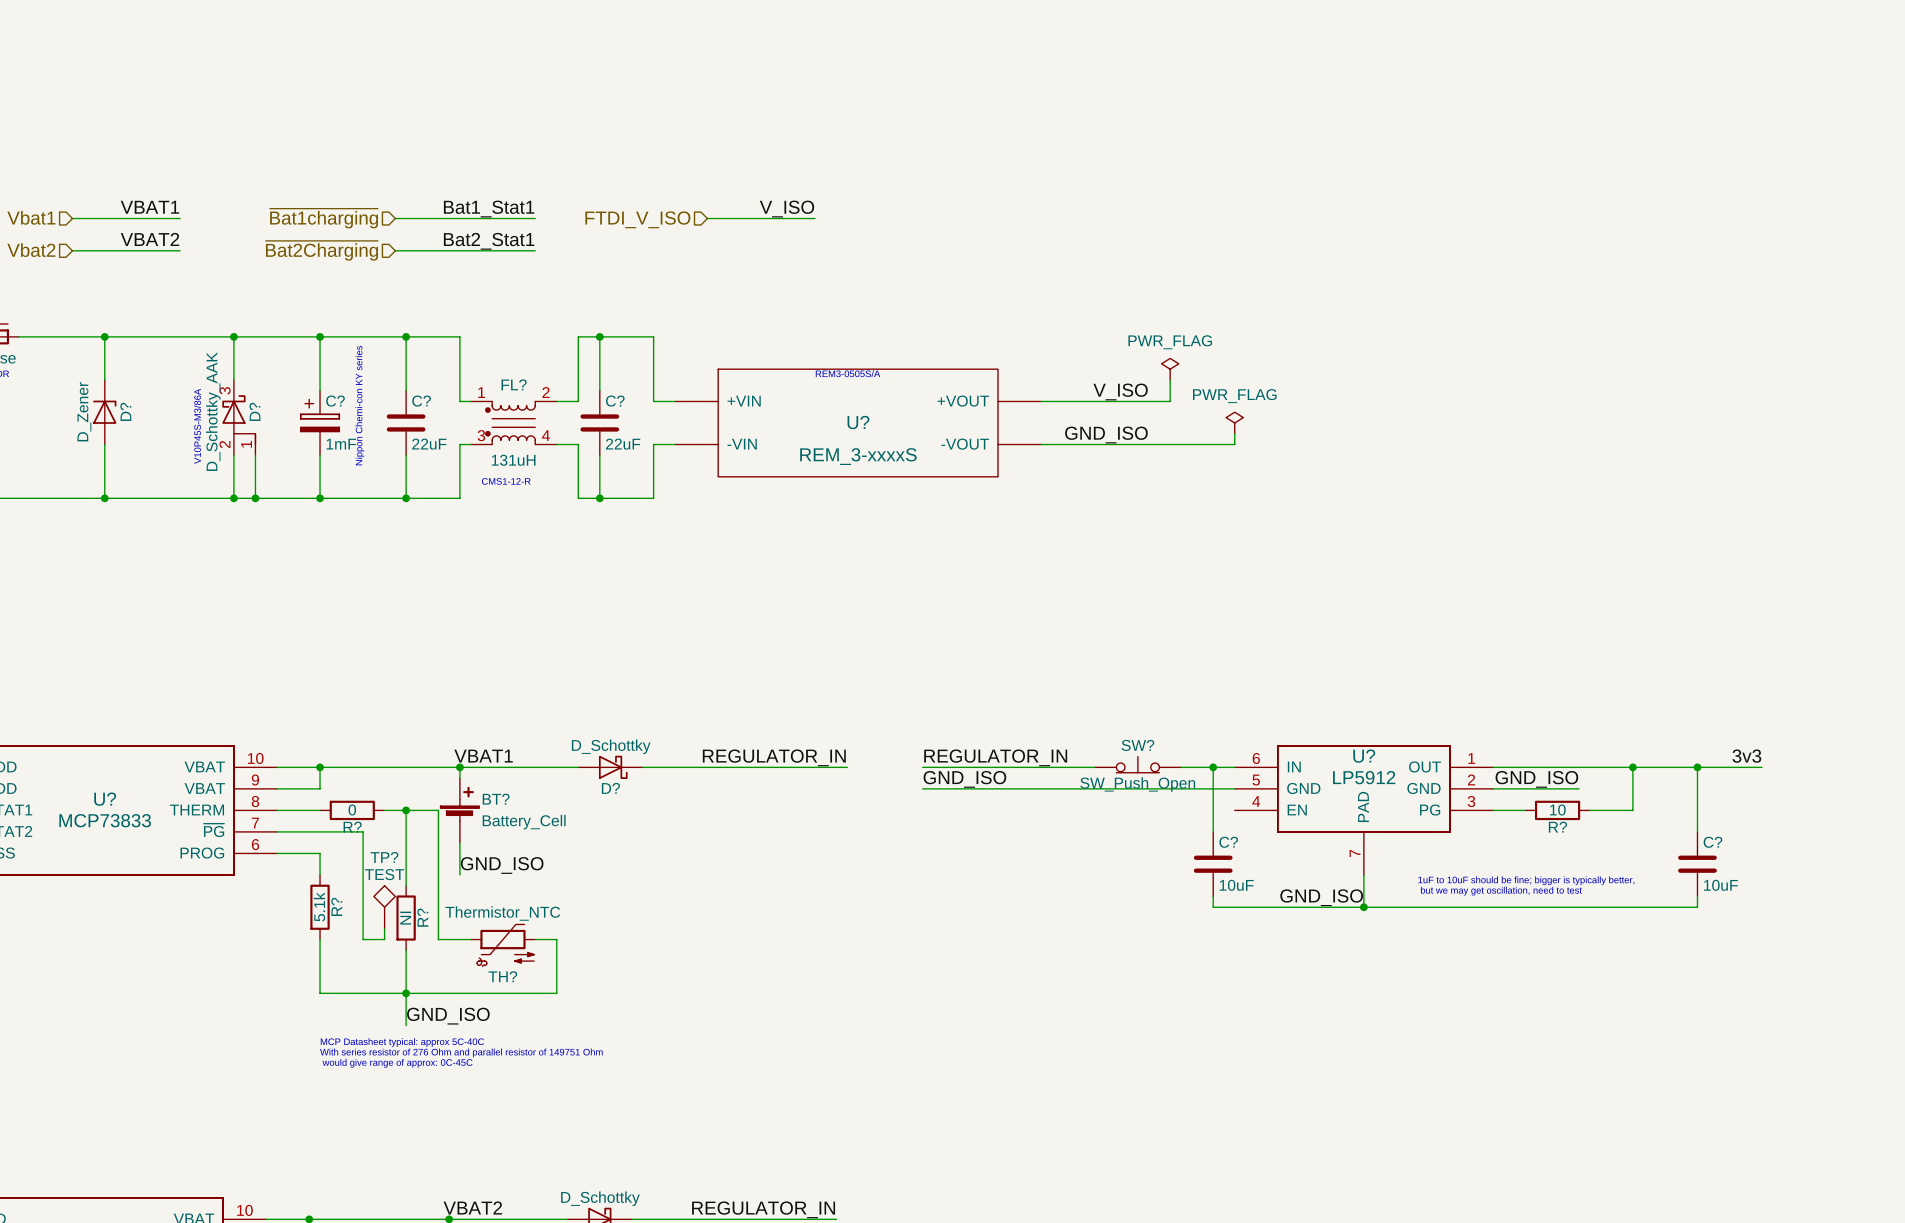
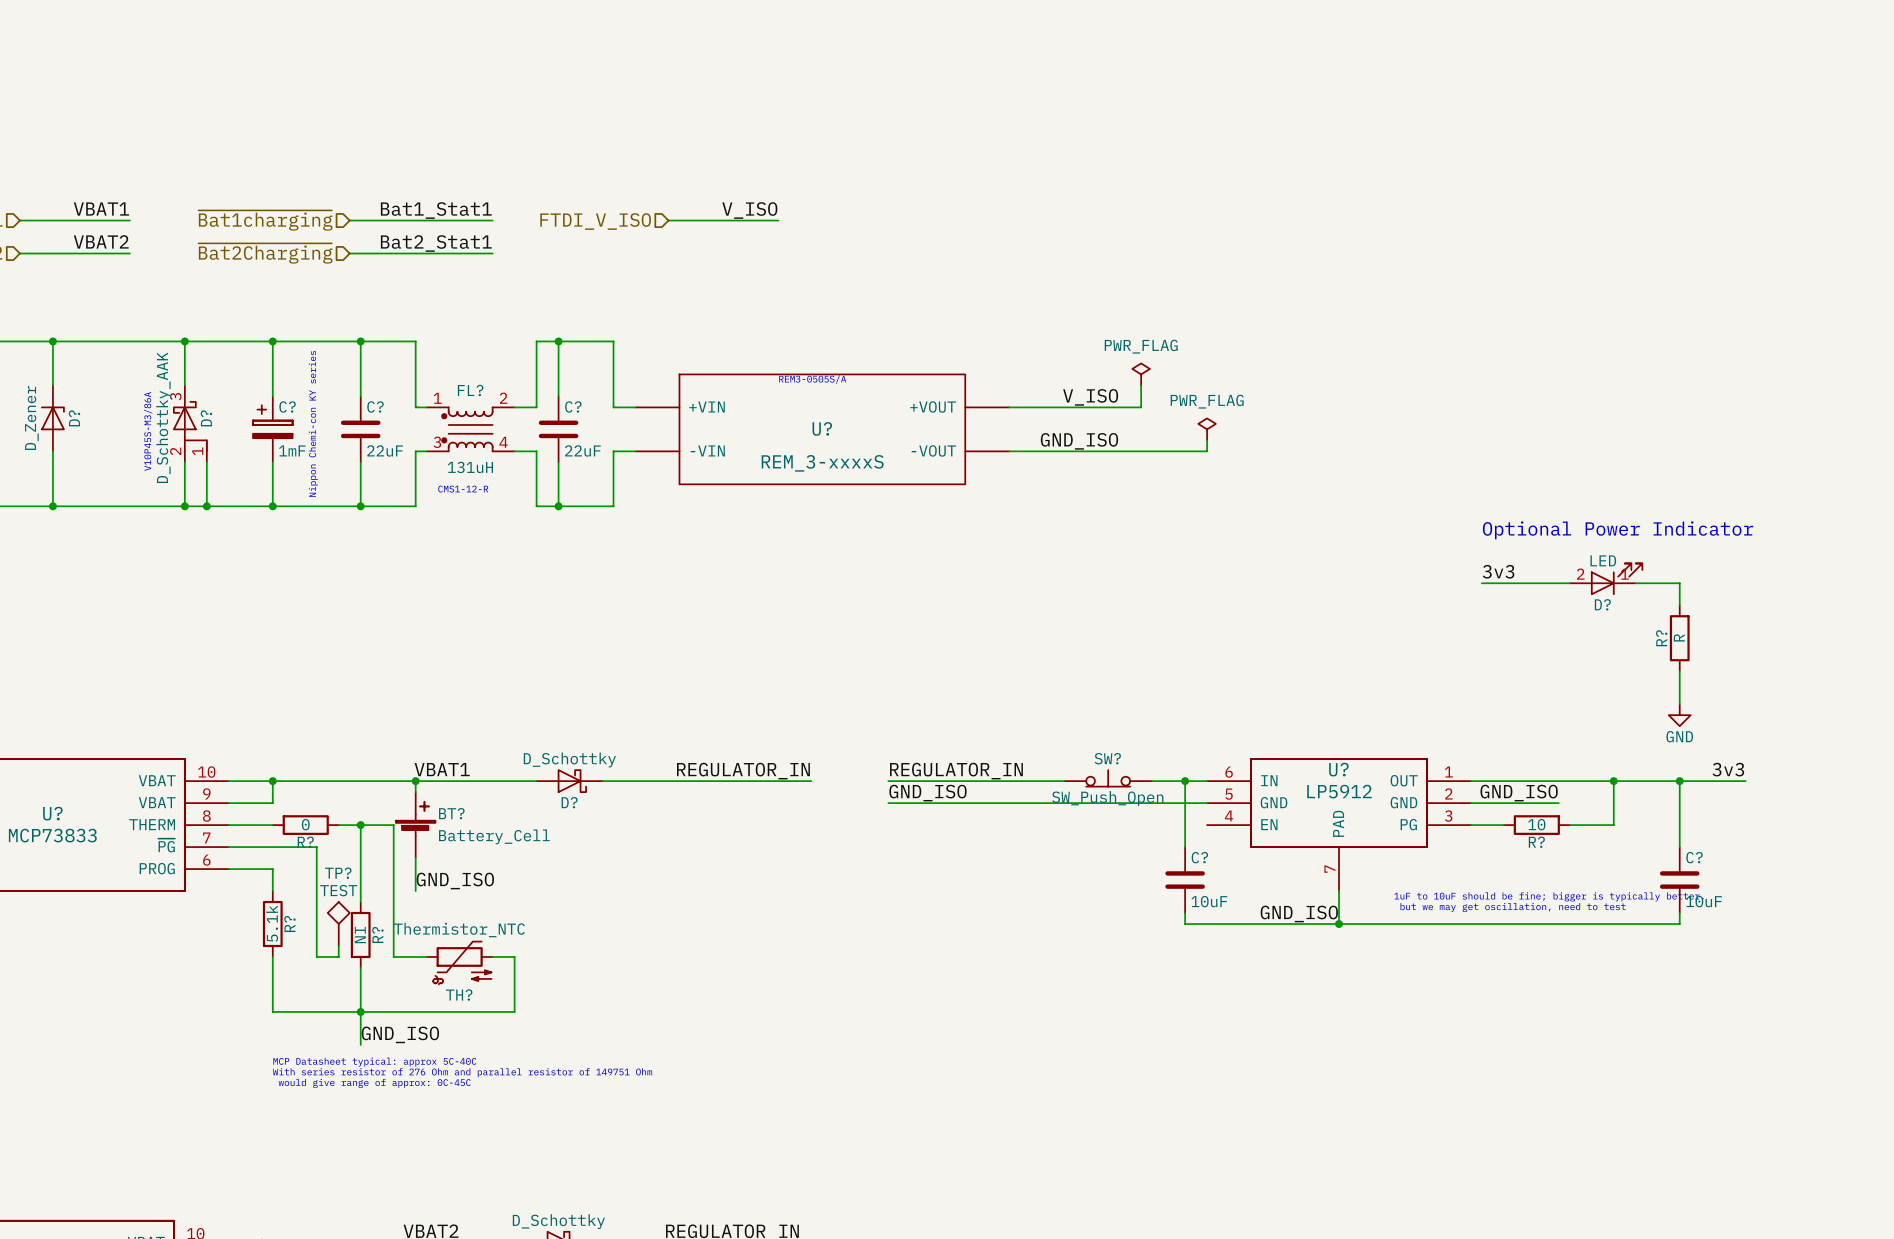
text: none -> Optional Power Indicator (1618, 530)
label: none -> 3v3 (1498, 571)
D?: none -> LED (1606, 579)
wire: none -> (1481, 583) (1569, 583)
wire: none -> (1635, 583) (1679, 583) (1679, 605)
R?: none -> R (1679, 638)
wire: none -> (1679, 671) (1679, 704)
power symbol: none -> GND (1679, 715)

